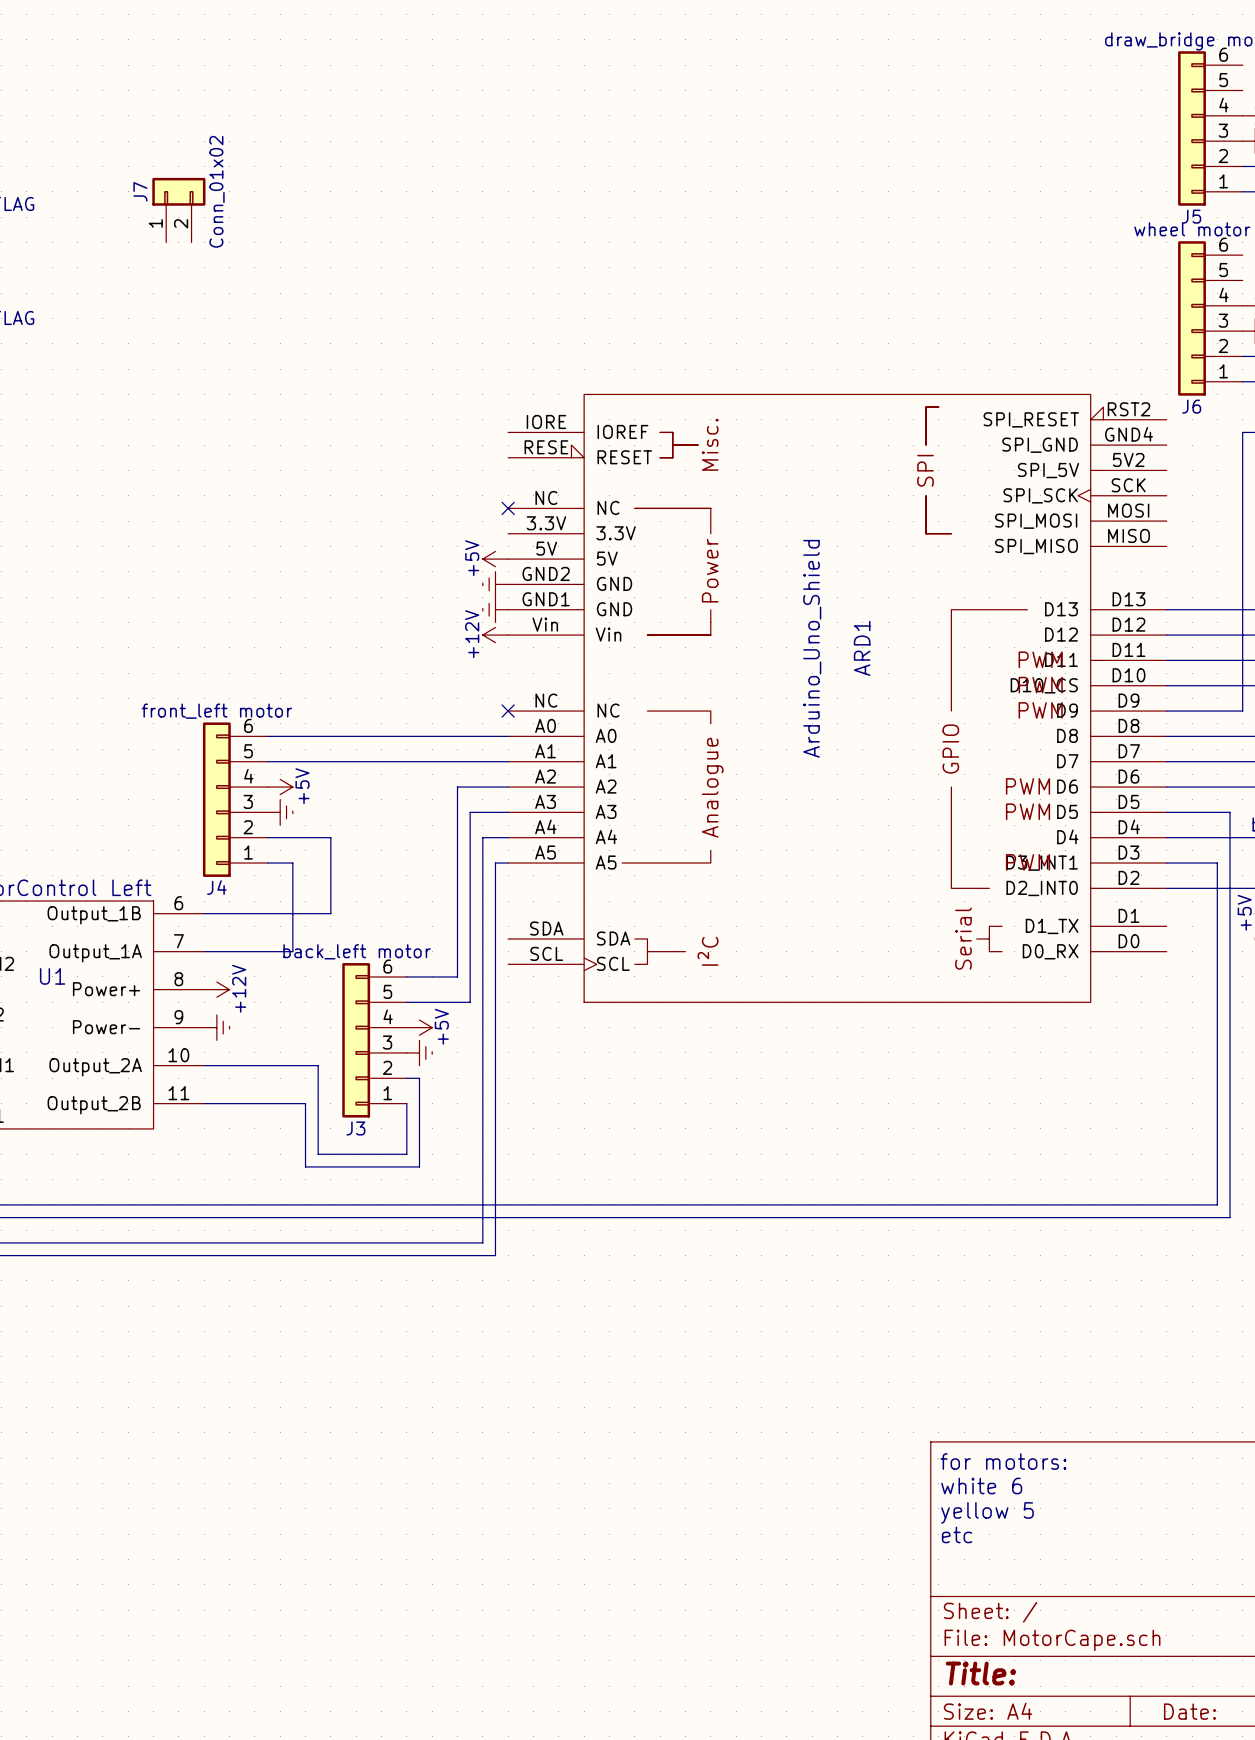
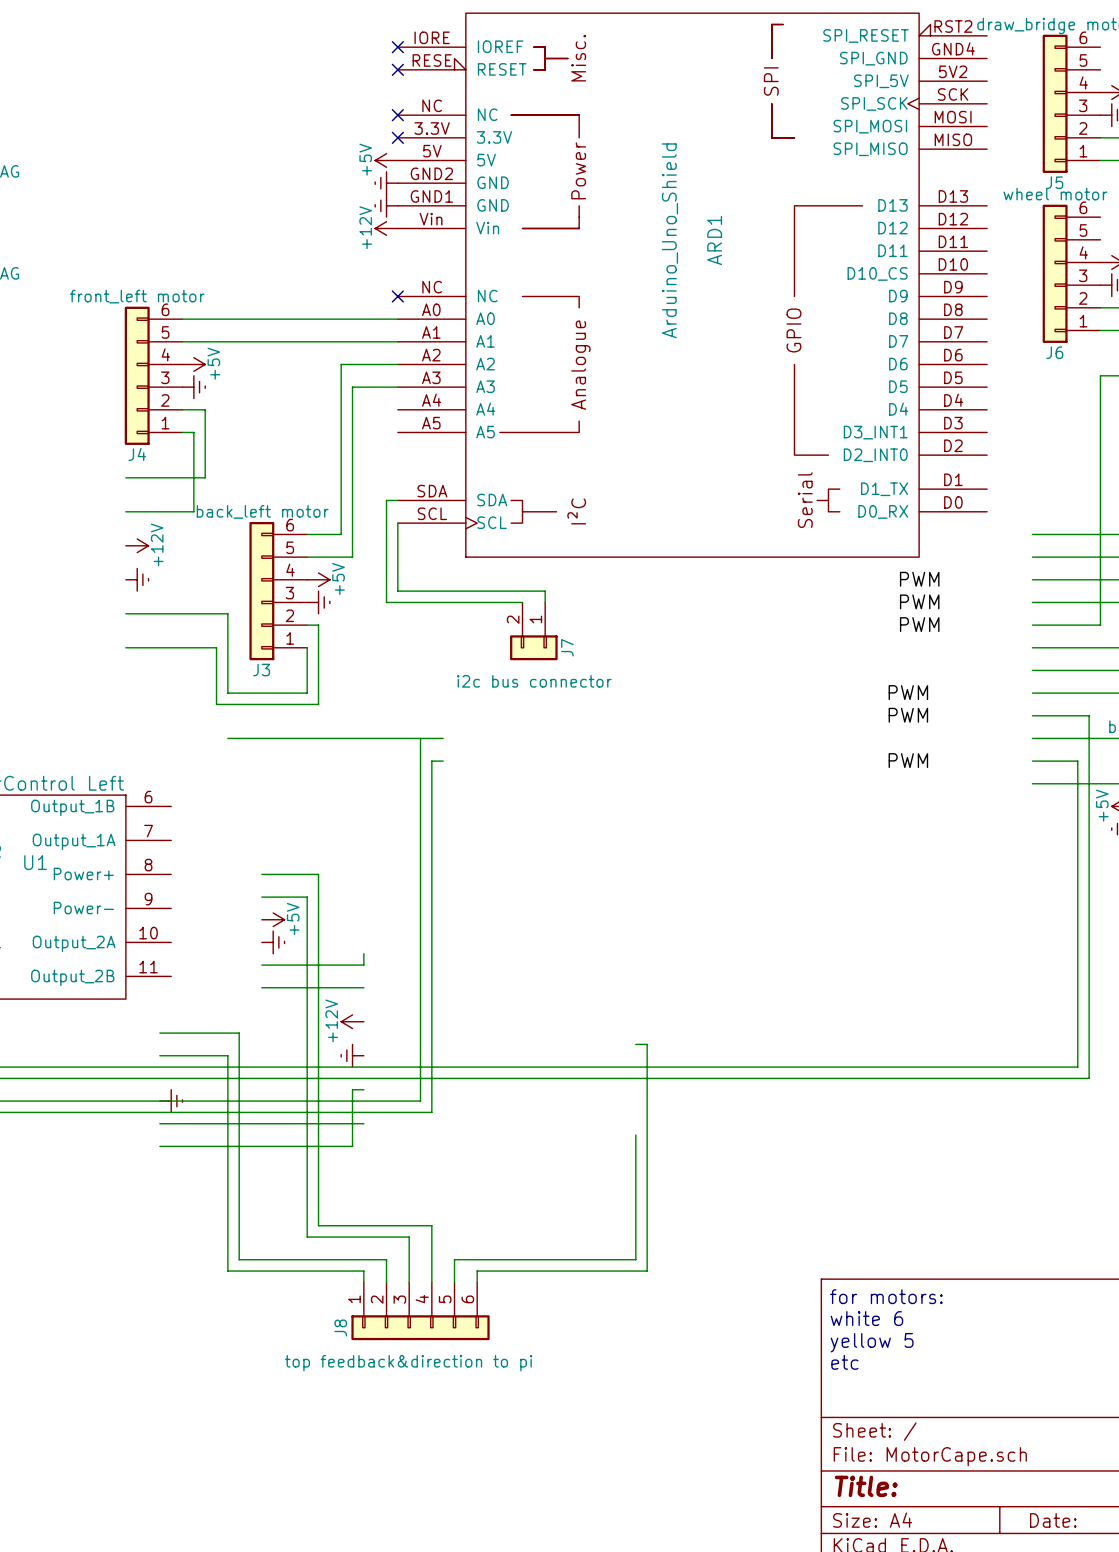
no-connect mark: none -> (397, 47)
no-connect mark: none -> (397, 69)
no-connect mark: none -> (397, 115)
no-connect mark: none -> (397, 137)
J7 rotation: 0° (178, 191) -> 180° (533, 647)
J7 value: Conn_01x02 (216, 191) -> i2c bus connector (534, 681)
power symbol: none -> +5V (386, 160)
J7 position: (178, 210) -> (533, 631)
power symbol: none -> (386, 183)
power symbol: none -> (386, 205)
power symbol: none -> +12V (386, 228)
no-connect mark: none -> (397, 296)
wire: none -> (182, 319) (397, 319)
wire: none -> (182, 341) (397, 341)
power symbol: none -> +5V (193, 364)
wire: none -> (397, 364) (341, 364) (341, 534) (307, 534)
power symbol: none -> (193, 387)
wire: none -> (397, 387) (352, 387) (352, 557) (307, 557)
wire: none -> (182, 409) (205, 409) (205, 477) (125, 477)
wire: none -> (182, 432) (193, 432) (193, 511) (125, 511)
no-connect mark: (508, 508) -> none
power symbol: +5V (495, 559) -> none
wire: none -> (397, 500) (386, 500) (386, 602) (522, 602)
power symbol: (495, 584) -> none
wire: none -> (397, 523) (397, 591) (545, 591) (545, 602)
power symbol: (495, 609) -> none
power symbol: none -> +12V (137, 545)
power symbol: +12V (495, 635) -> none
power symbol: none -> (137, 579)
power symbol: none -> +5V (318, 579)
power symbol: none -> (318, 602)
wire: none -> (125, 613) (227, 613) (227, 693) (307, 693) (307, 647)
ARD1 position: (837, 698) -> (692, 285)
wire: none -> (307, 625) (318, 625) (318, 704) (216, 704) (216, 647) (125, 647)
no-connect mark: (508, 711) -> none
wire: (267, 736) (508, 736) -> none
wire: (267, 761) (508, 761) -> none
power symbol: +5V (280, 787) -> none
wire: (508, 787) (457, 787) (457, 976) (406, 976) -> none
J4 position: (235, 799) -> (153, 375)
power symbol: (280, 812) -> none
wire: (508, 812) (470, 812) (470, 1002) (406, 1002) -> none
wire: (330, 837) (330, 913) (204, 913) -> (284, 738) (420, 738)
wire: (267, 863) (292, 863) (292, 951) (204, 951) -> none
power symbol: +12V (216, 989) -> none
wire: none -> (261, 874) (318, 874) (318, 1225) (431, 1225) (431, 1282)
wire: none -> (261, 897) (307, 897) (307, 1237) (409, 1237) (409, 1282)
power symbol: (216, 1027) -> none
power symbol position: +5V (419, 1027) -> +5V (273, 919)
J3 position: (374, 1040) -> (278, 591)
power symbol: (419, 1052) -> none
wire: (204, 1065) (318, 1065) (318, 1154) (406, 1154) (406, 1103) -> none
power symbol: none -> (273, 942)
wire: (406, 1078) (419, 1078) -> none
wire: (419, 1090) (419, 1166) (305, 1166) (305, 1103) (204, 1103) -> (363, 965) (261, 965)
wire: none -> (261, 987) (363, 987)
power symbol: none -> +12V (352, 1021)
wire: none -> (159, 1033) (239, 1033) (239, 1259) (386, 1259) (386, 1282)
wire: none -> (635, 1044) (647, 1044) (647, 1271) (477, 1271) (477, 1282)
wire: none -> (159, 1055) (227, 1055) (227, 1271) (363, 1271) (363, 1282)
power symbol: none -> (352, 1055)
wire: none -> (363, 1089) (352, 1089) (352, 1146) (159, 1146)
power symbol: none -> (171, 1101)
wire: none -> (159, 1123) (363, 1123)
wire: none -> (635, 1135) (635, 1259) (454, 1259) (454, 1282)
J8: none -> top feedback&direction to pi (420, 1311)

